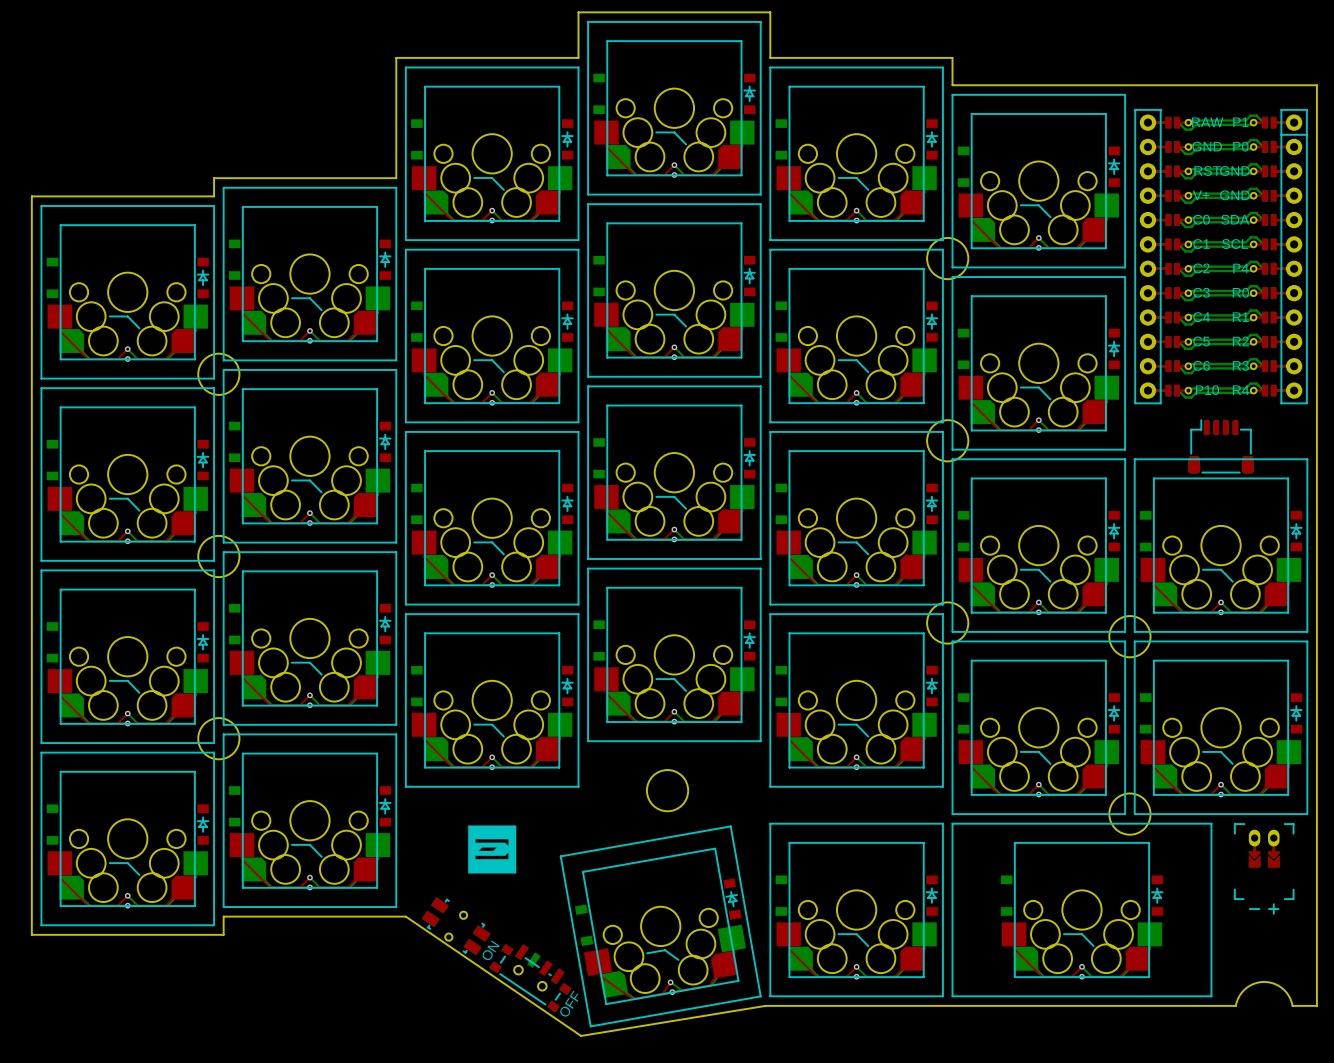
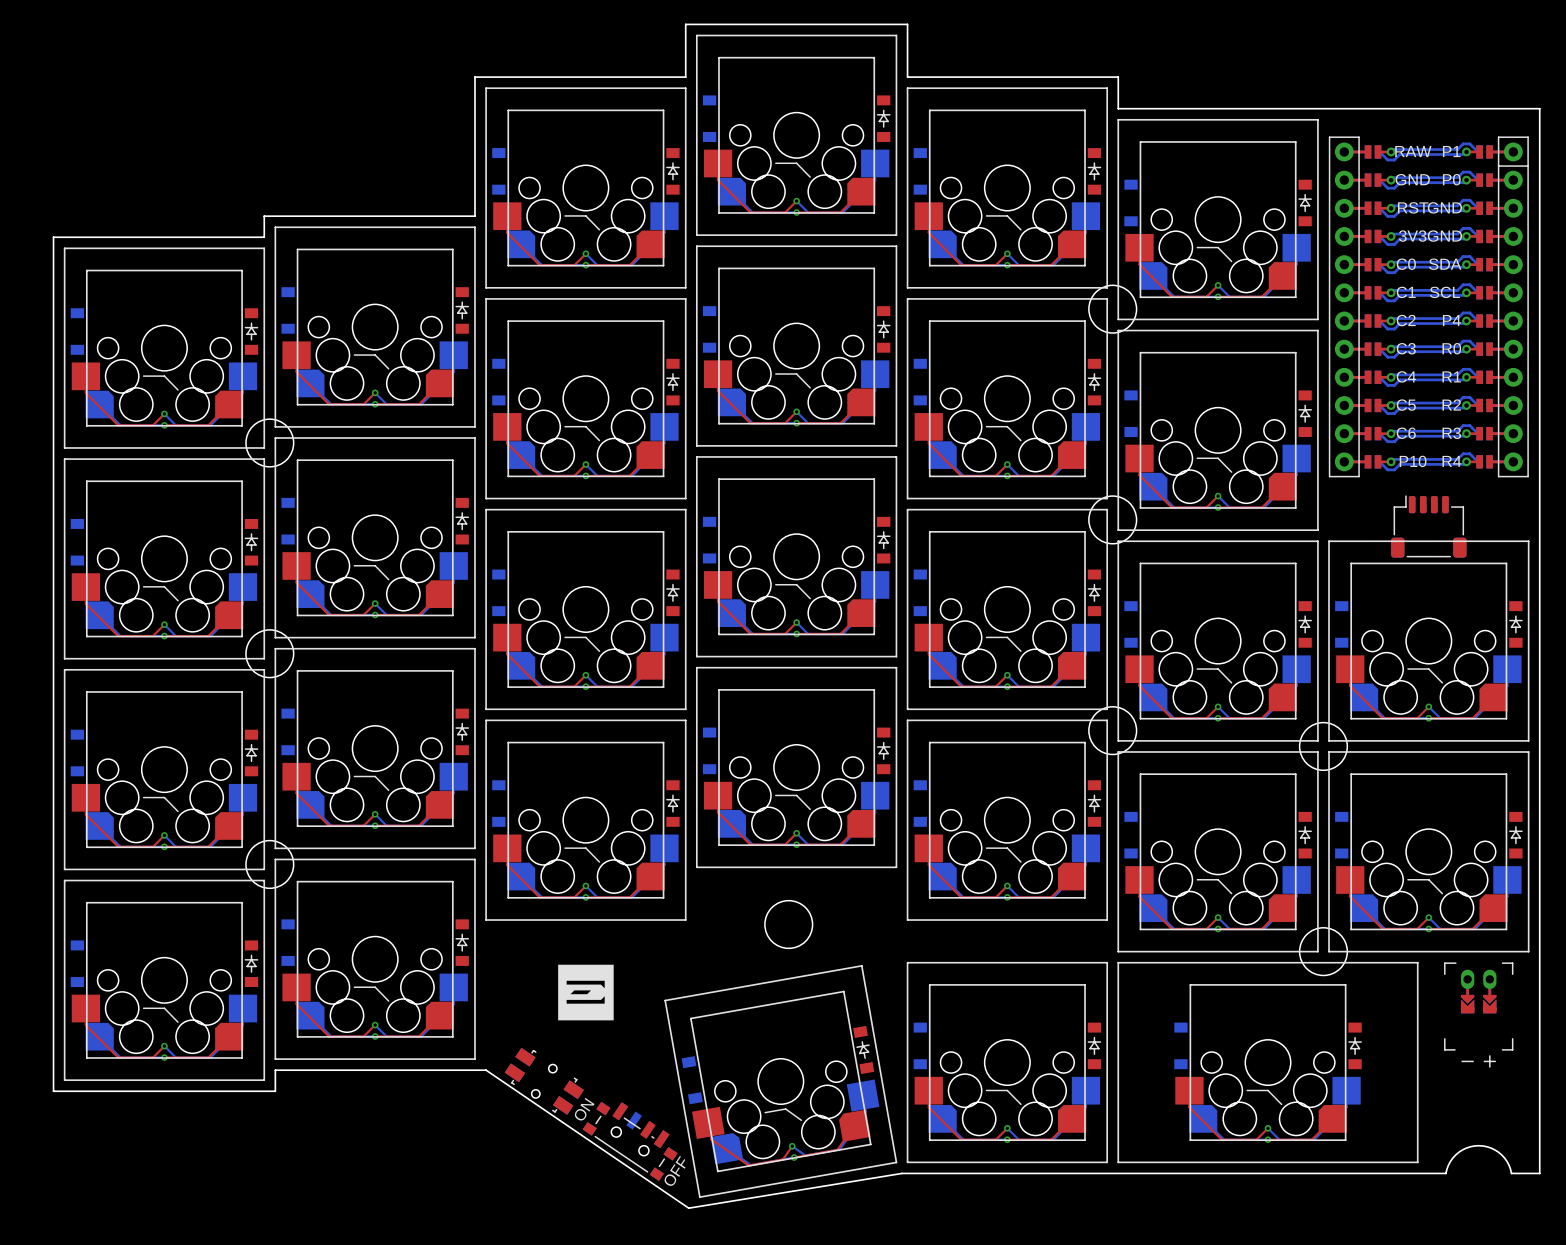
part text: V+ (1201, 195) -> none
part text: none -> 3V3 (1412, 236)

